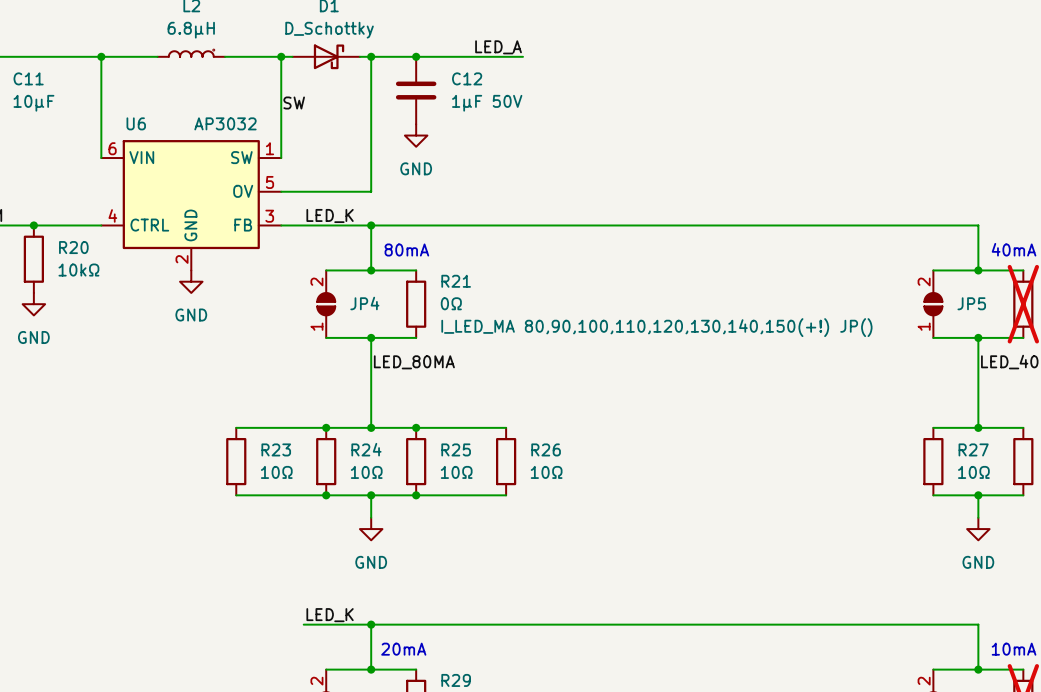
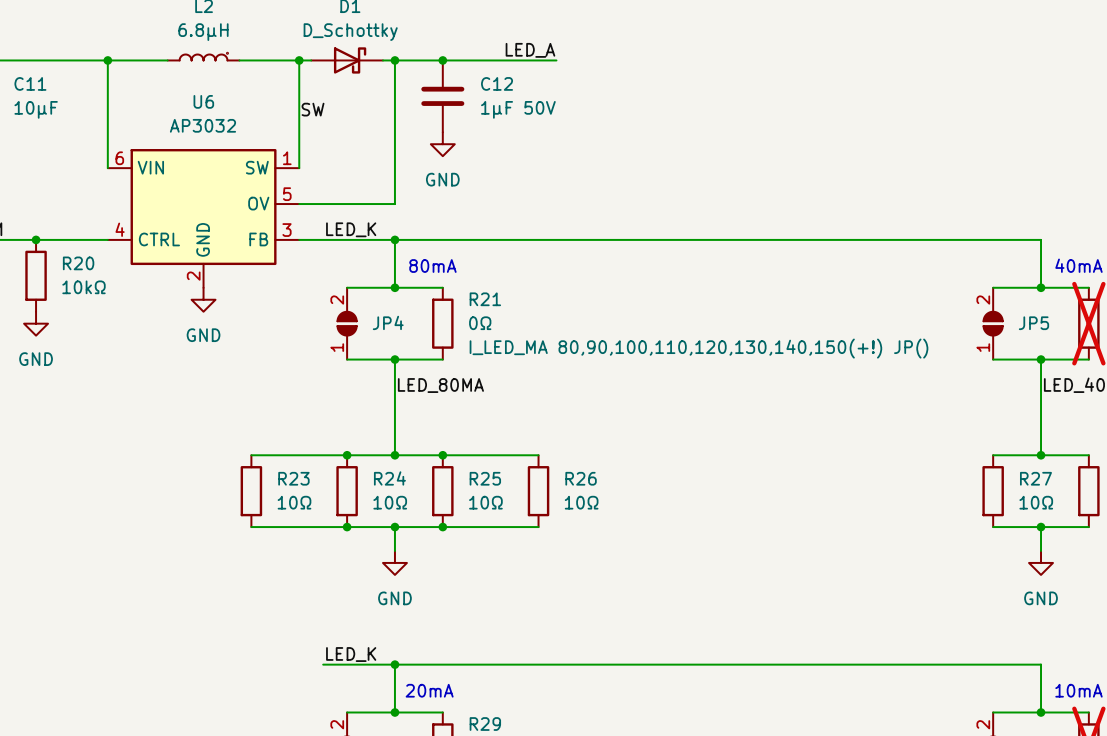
U6 name position: U6 (136, 123) -> U6 (203, 101)
U6 value position: AP3032 (225, 123) -> AP3032 (202, 125)

